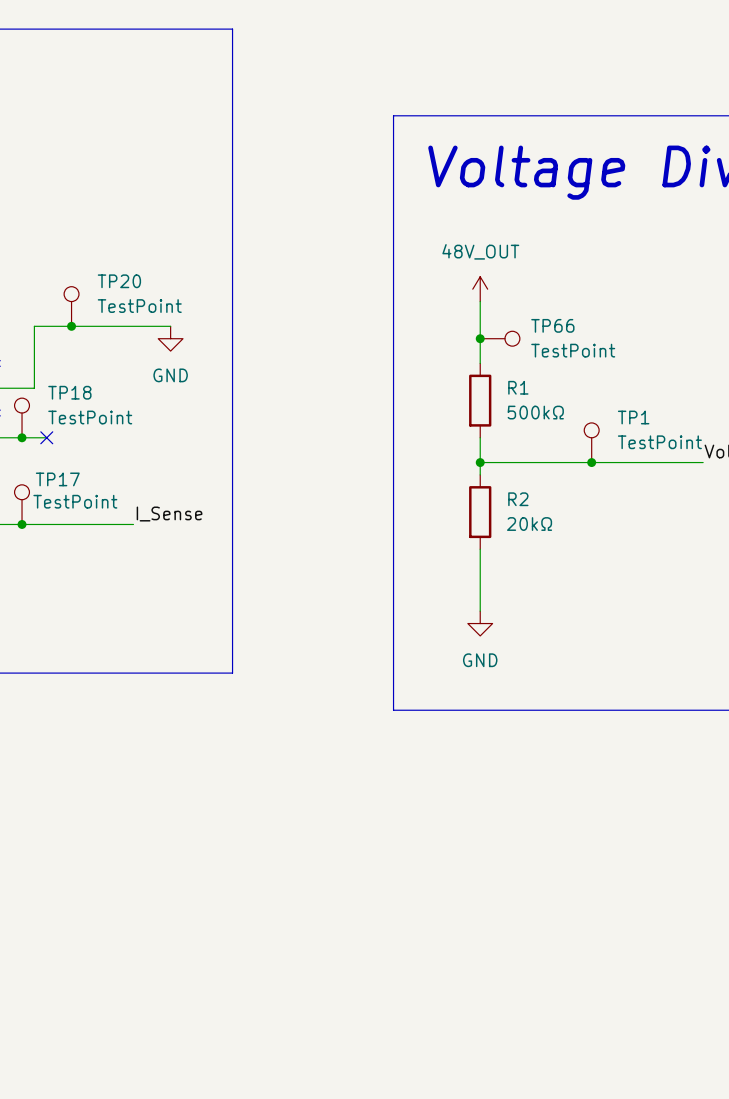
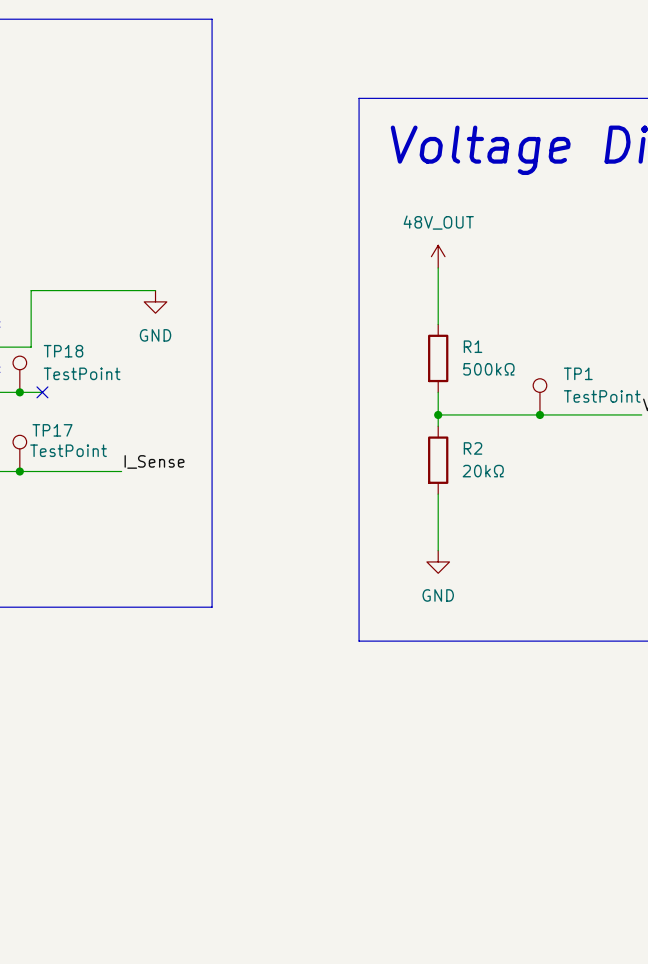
TP20: TestPoint (71, 306) -> none
junction: (71, 326) -> none
junction: (480, 338) -> none
TP66: TestPoint (500, 338) -> none

